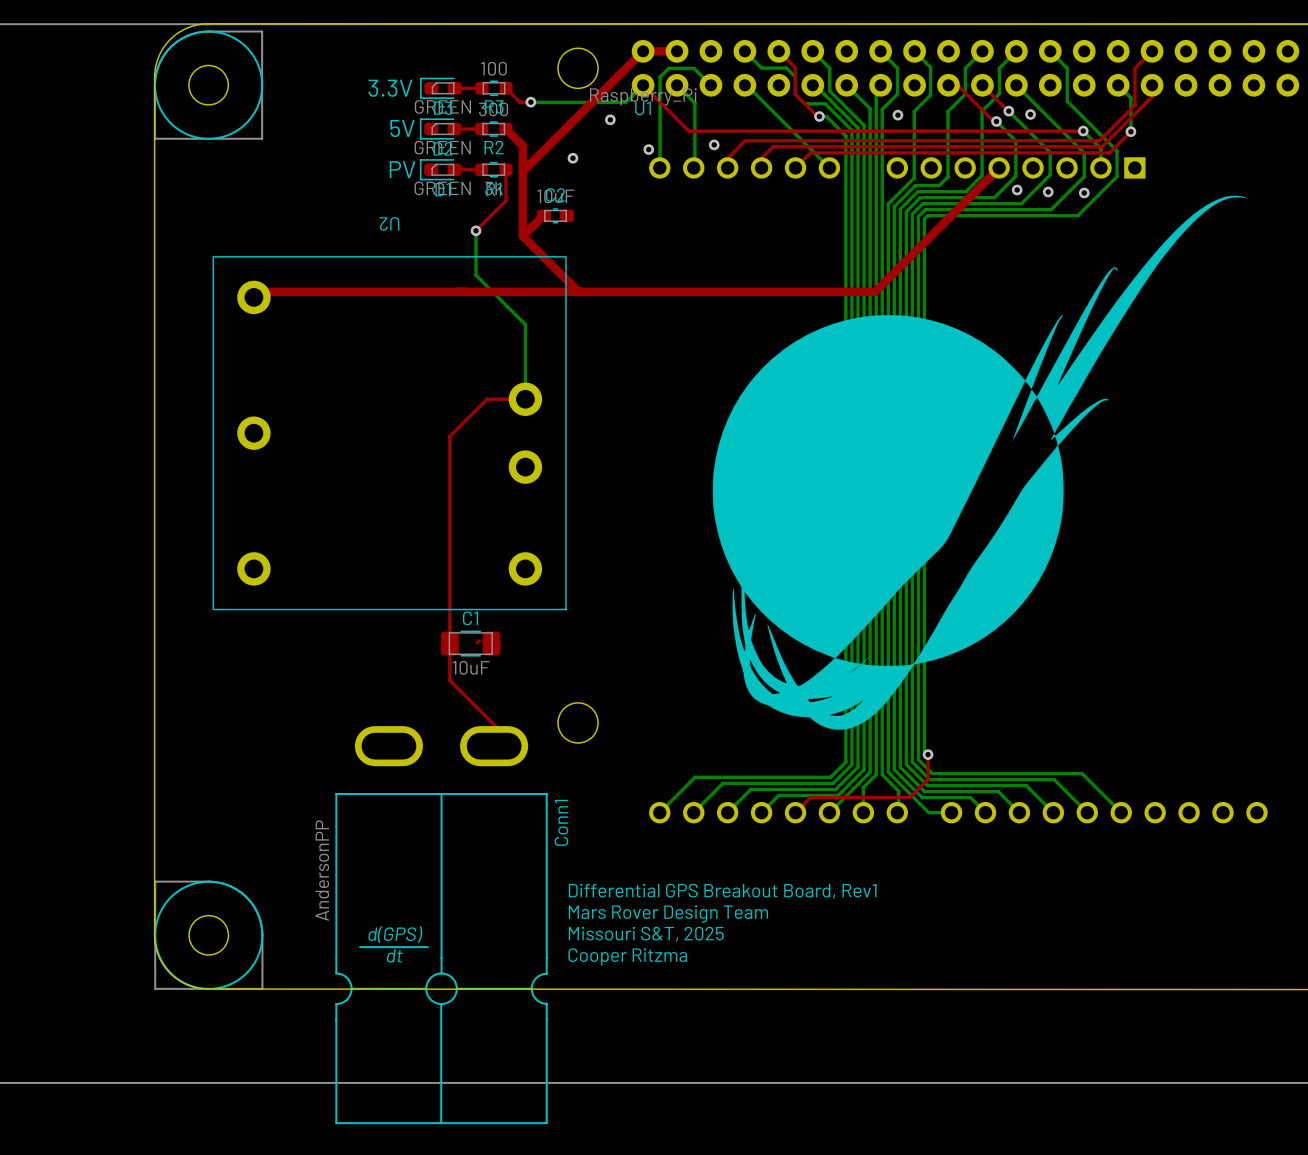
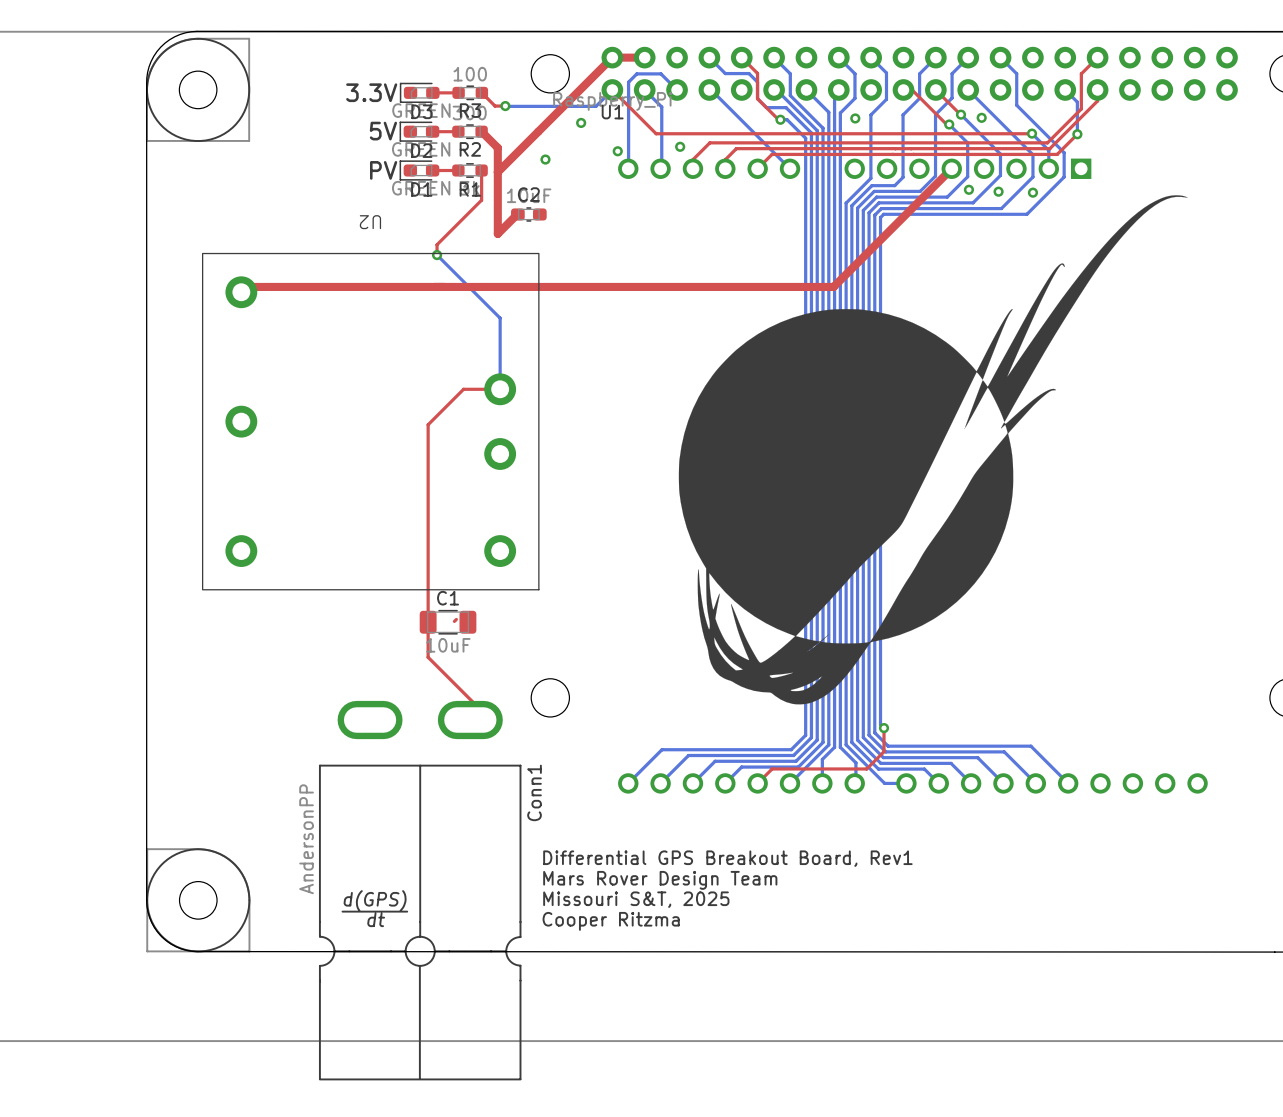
bottom track: (476, 230) (476, 275) -> (437, 255) (453, 271)
top track: none -> (453, 228) (437, 244) (437, 255)
via position: (476, 230) -> (437, 255)
top track: (522, 236) (578, 291) -> none

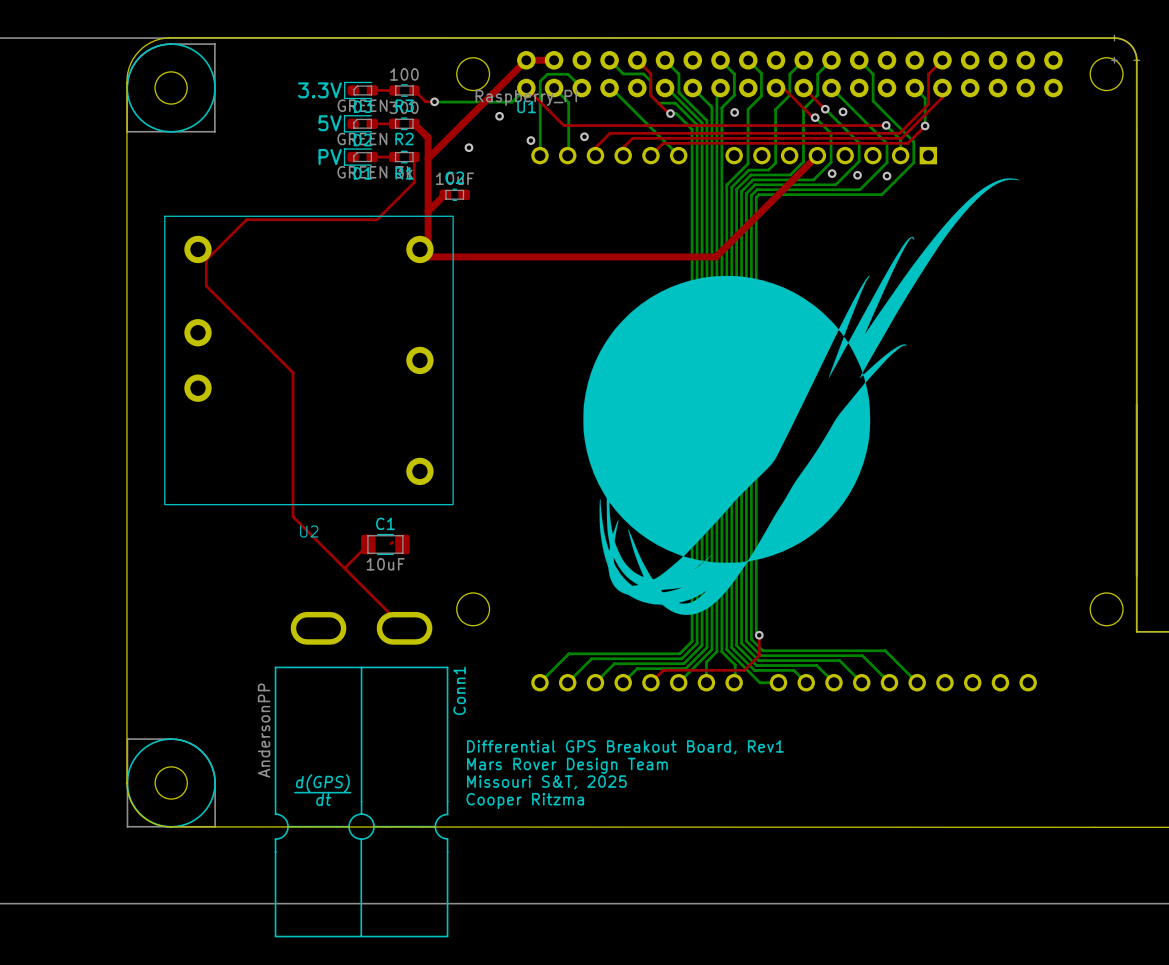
top track: (438, 243) (437, 255) -> none
bottom track: (437, 255) (500, 318) (500, 389) -> none
via: (437, 255) -> none
top track: (497, 286) (246, 286) (241, 292) -> (428, 256) (428, 211)
top track: (500, 389) (463, 389) (428, 424) (428, 657) (473, 702) (473, 723) -> (376, 219) (246, 219) (206, 259) (206, 286) (293, 372) (293, 516) (407, 631)
U2 rotation: 0° (370, 421) -> 180° (308, 360)
top track: none -> (368, 544) (345, 568)

